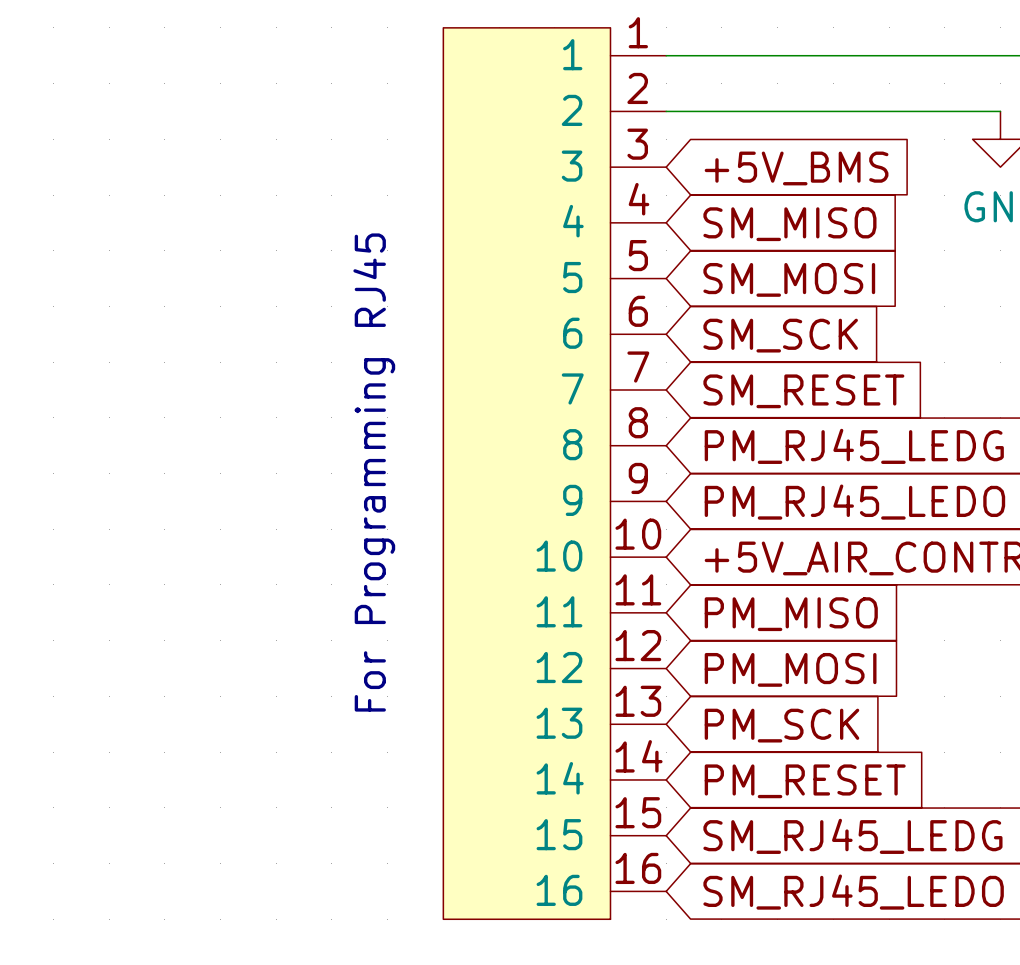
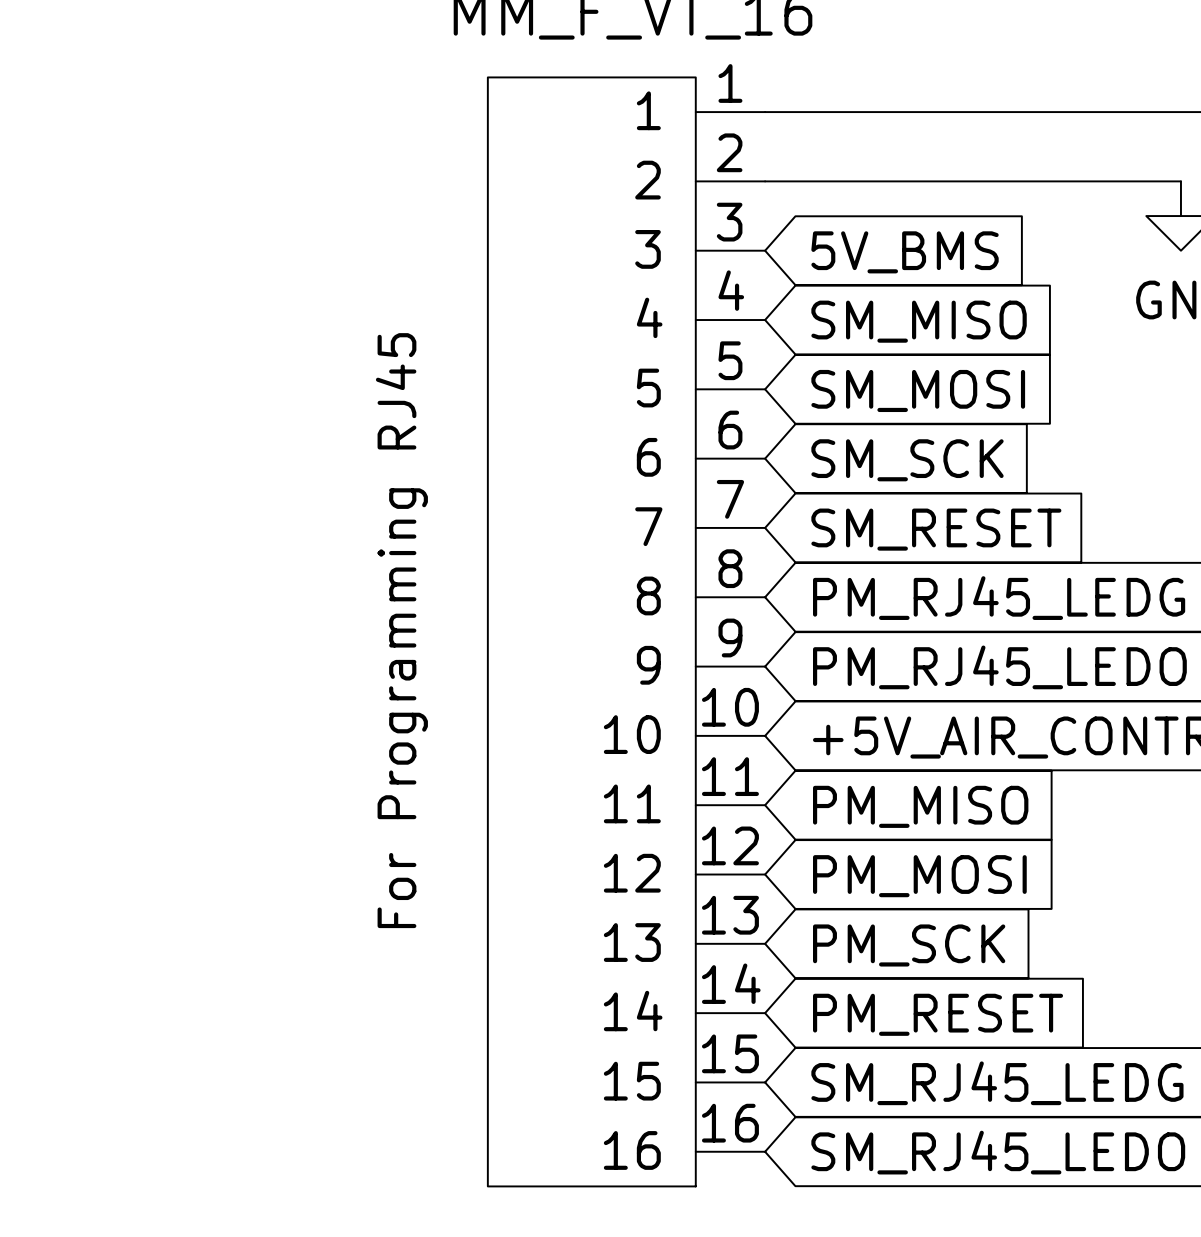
global label: +5V_BMS (796, 168) -> 5V_BMS (905, 252)

